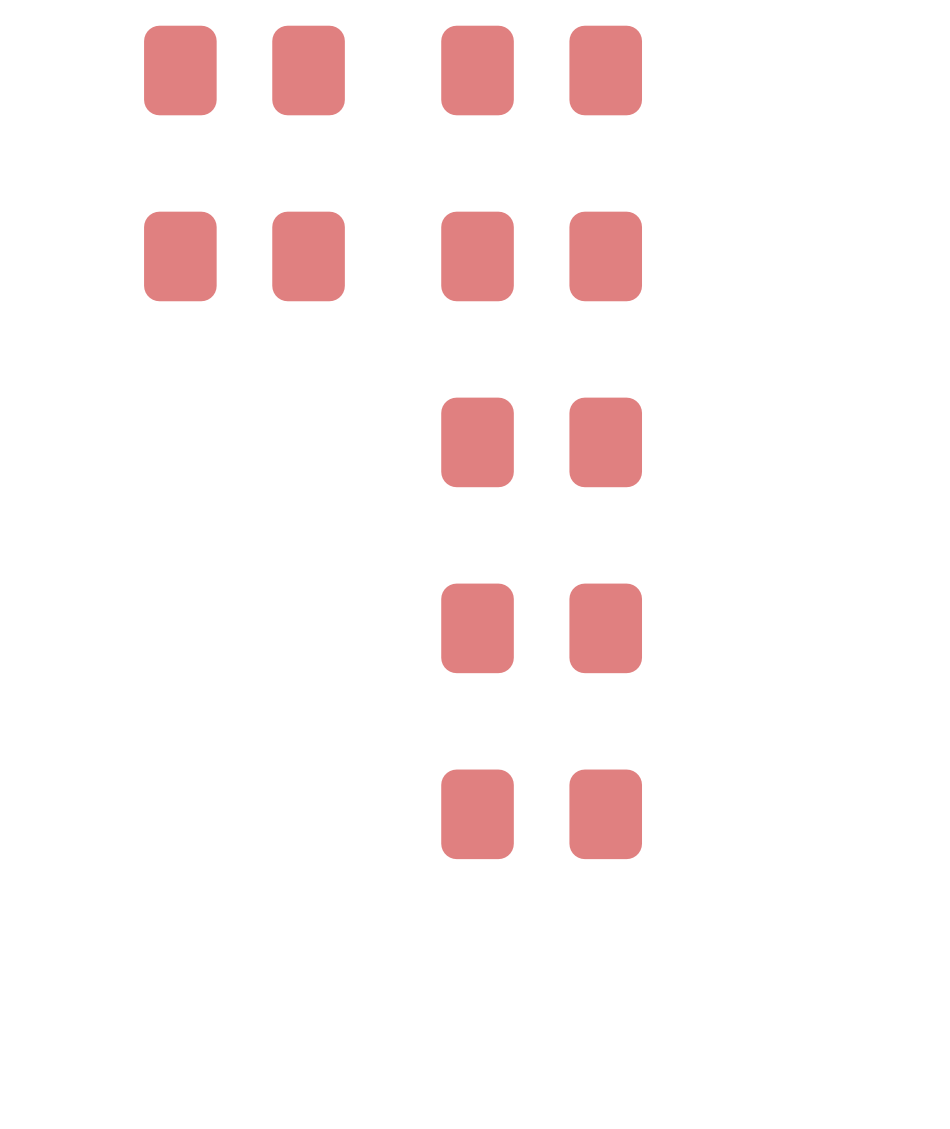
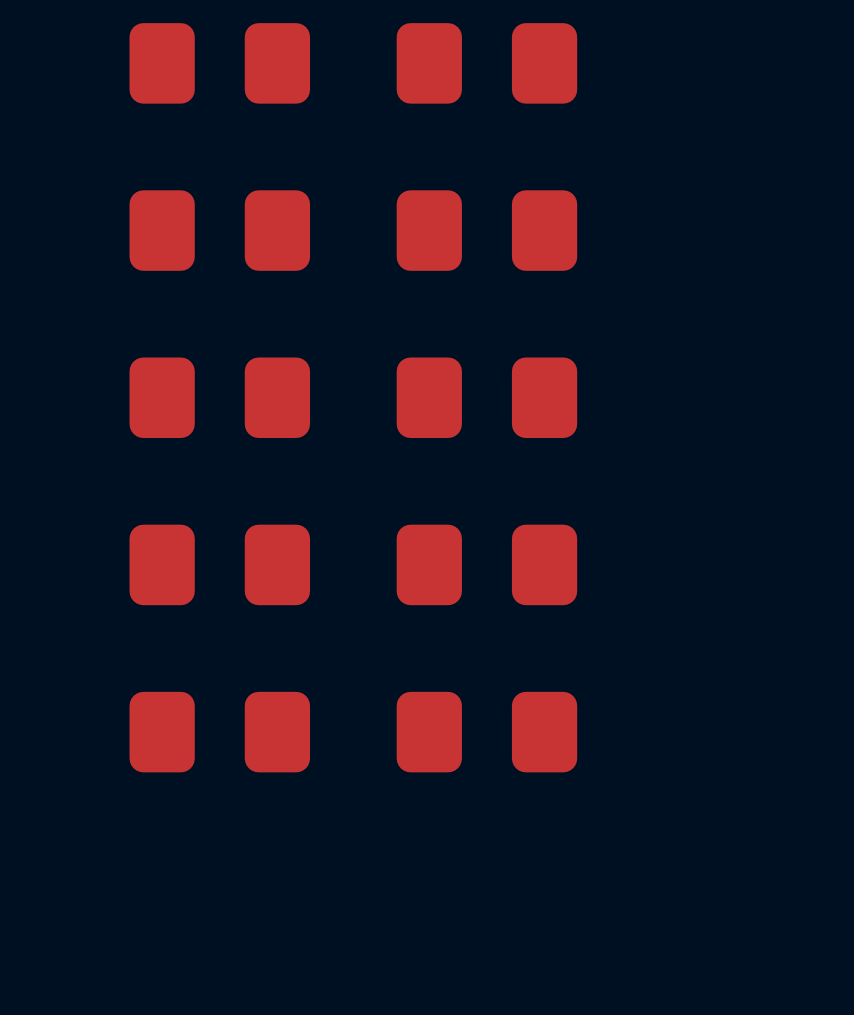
part: none -> (219, 397)
part: none -> (219, 564)
part: none -> (219, 732)

